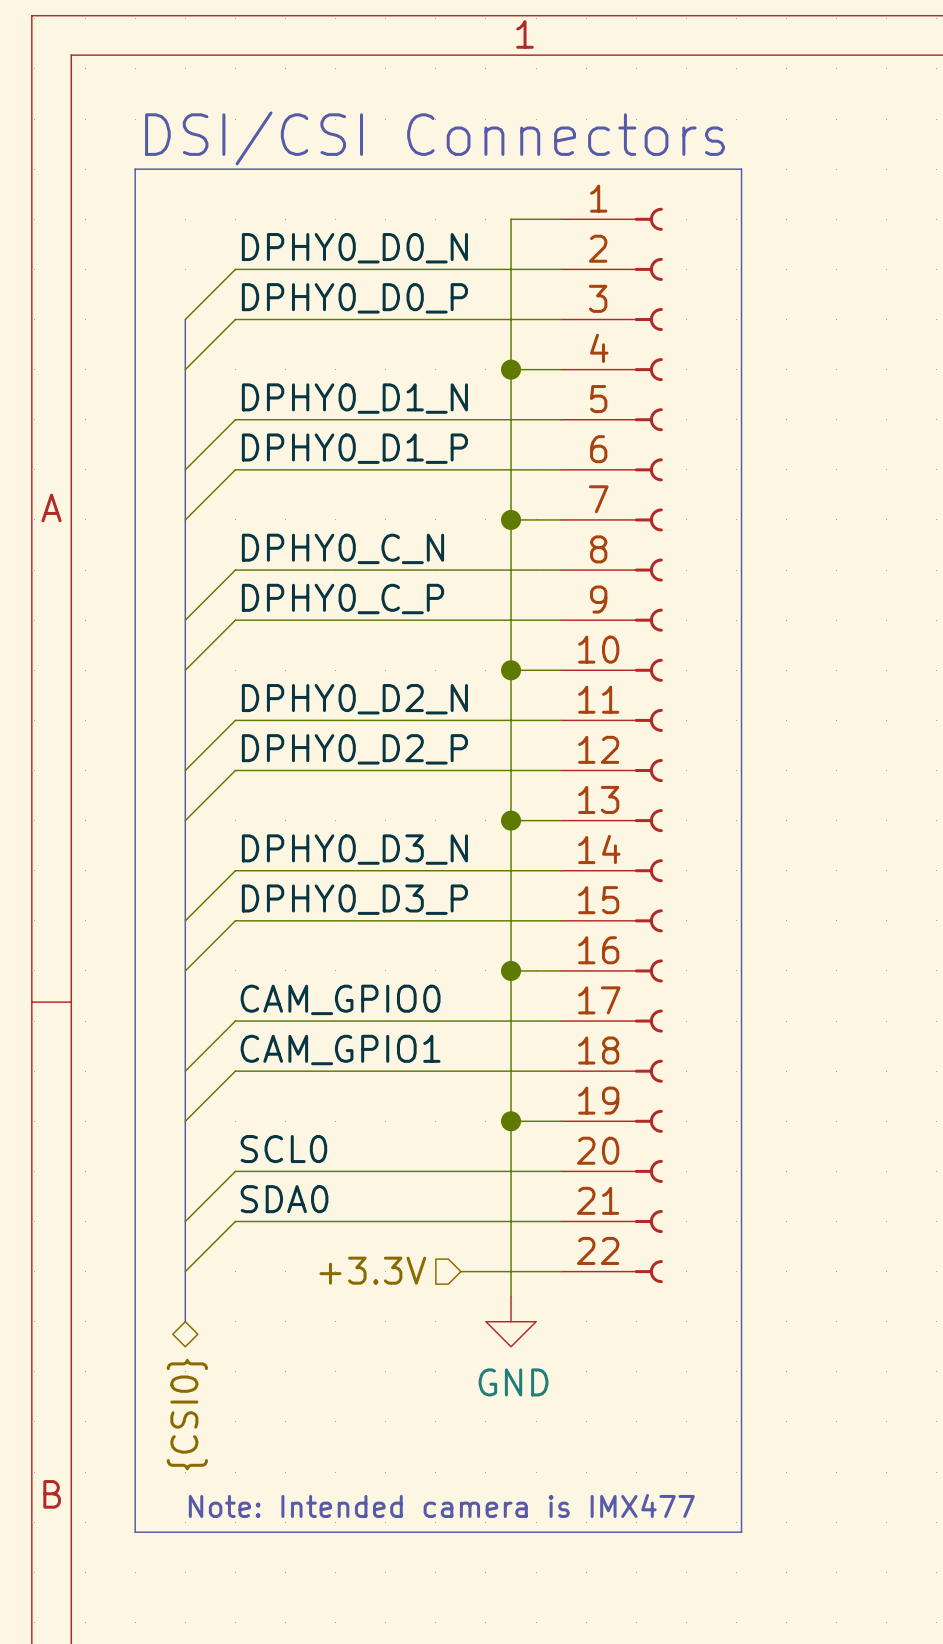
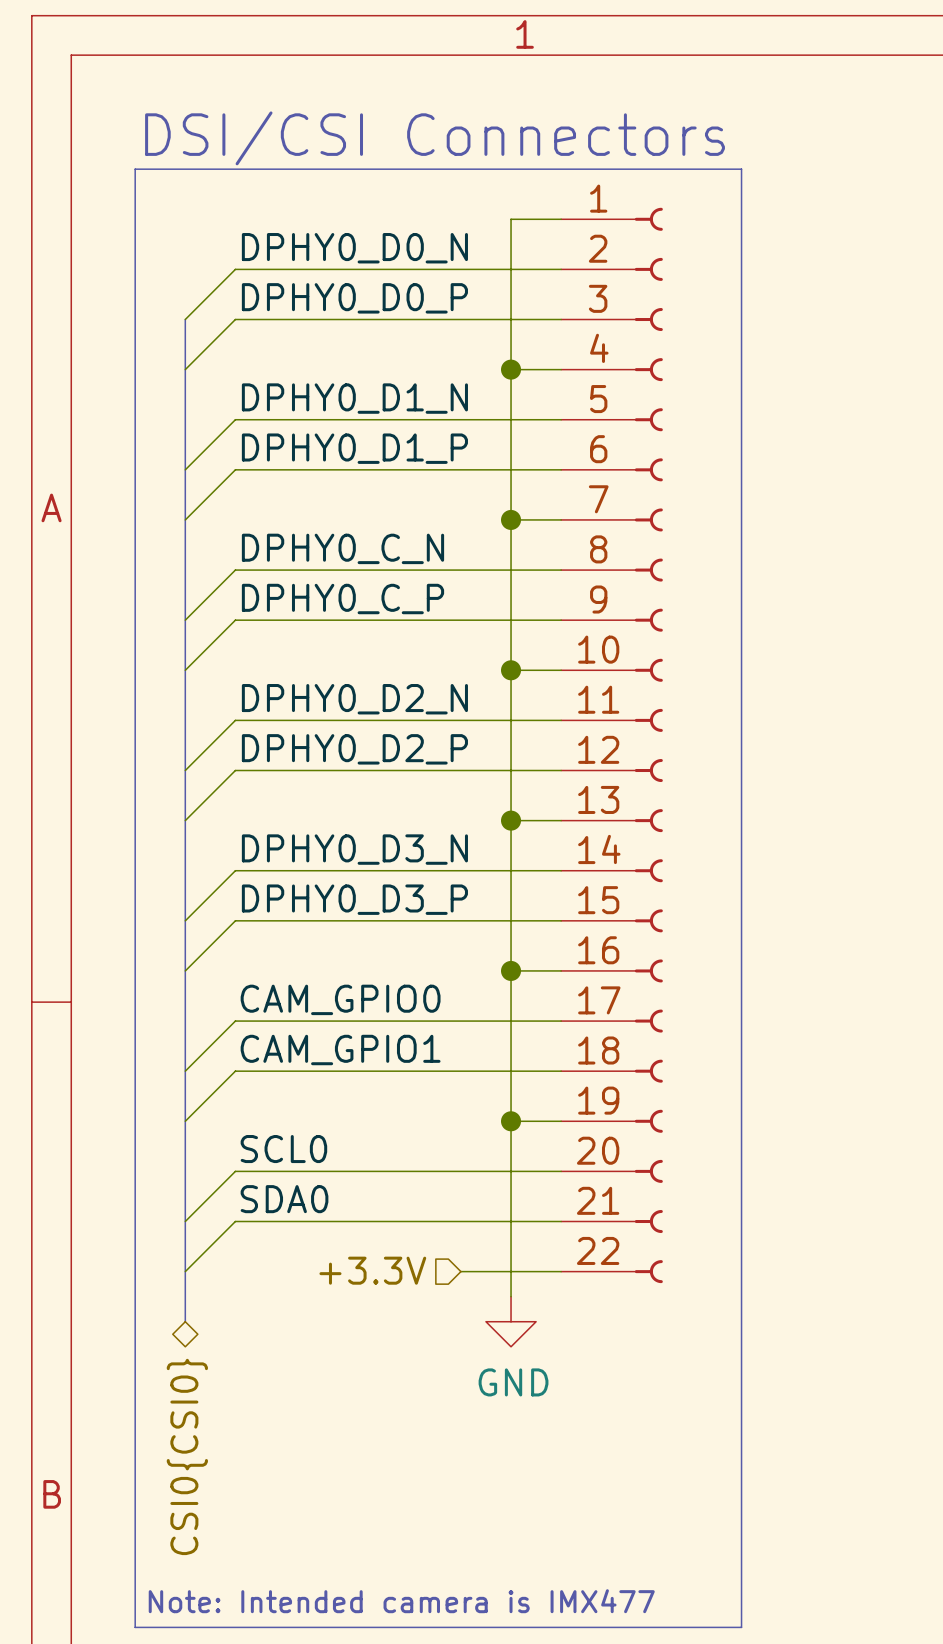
hierarchical label: {CSI0} (187, 1414) -> CSI0{CSI0} (187, 1456)
text position: Note: Intended camera is IMX477 (441, 1505) -> Note: Intended camera is IMX477 (401, 1601)
line: (135, 1532) (741, 1532) -> (135, 1532) (135, 1627) (741, 1627) (741, 1532)

